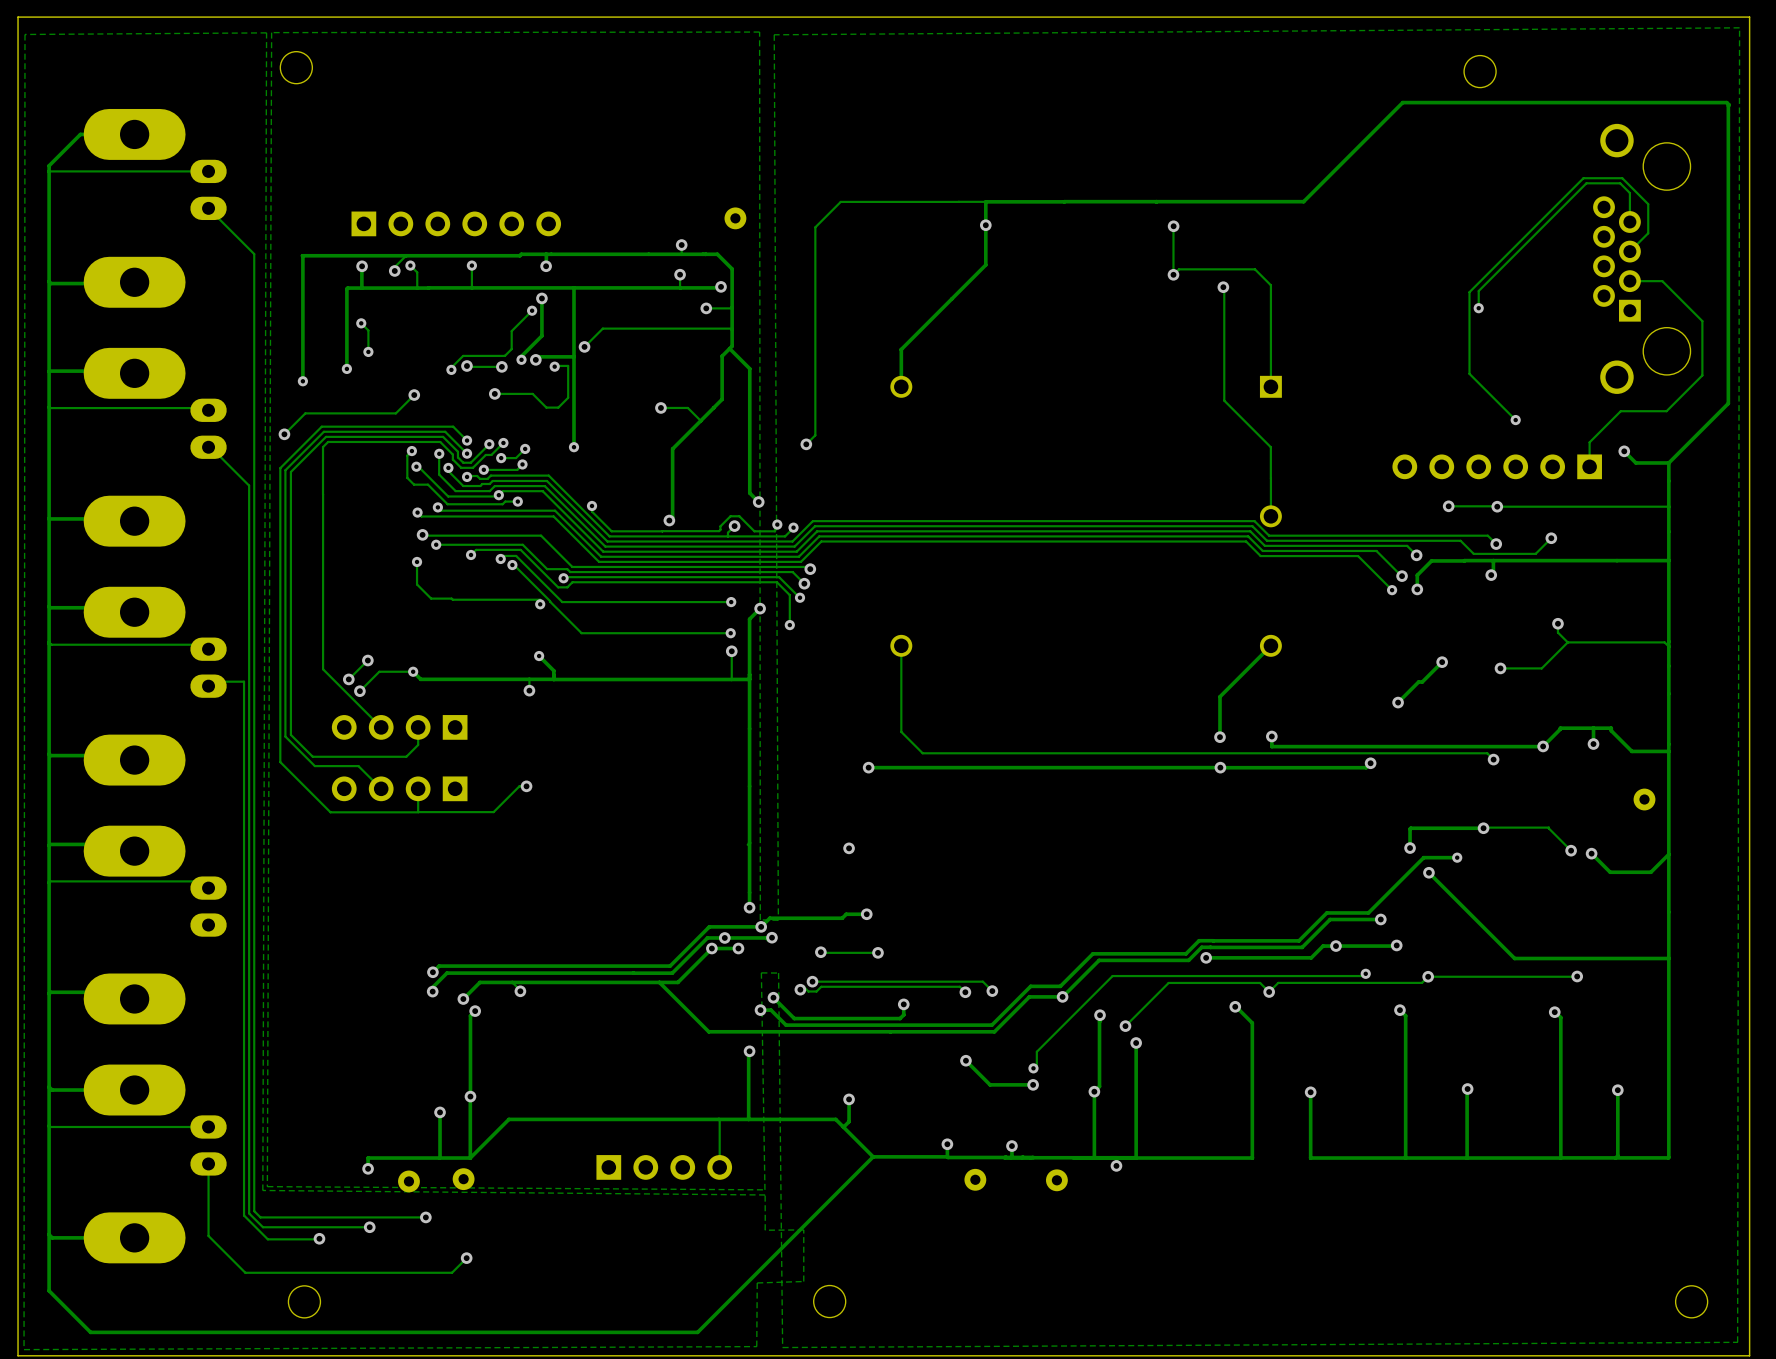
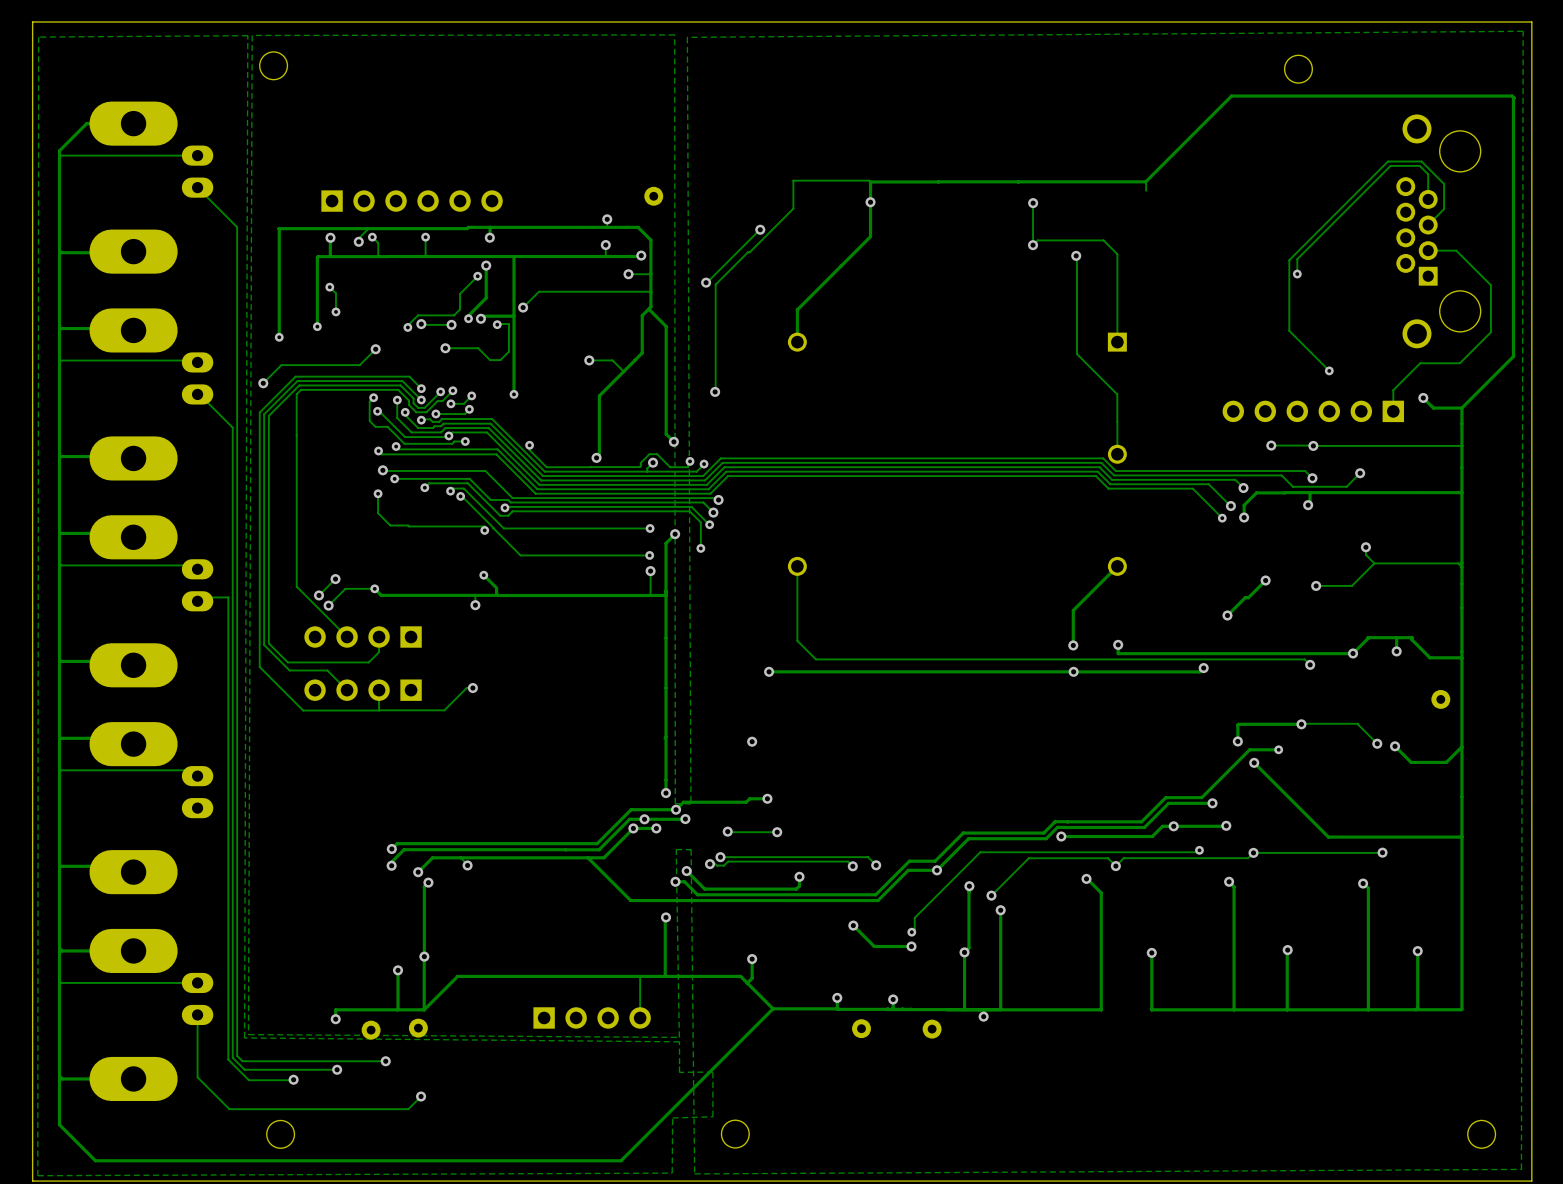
track: (985, 201) (840, 201) (815, 227) (815, 435) (806, 443) -> (870, 181) (793, 180) (793, 208) (715, 284) (715, 391)
track: none -> (1146, 182) (1146, 190)
track: none -> (760, 229) (706, 282)
via: none -> (760, 229)
via: none -> (706, 282)

